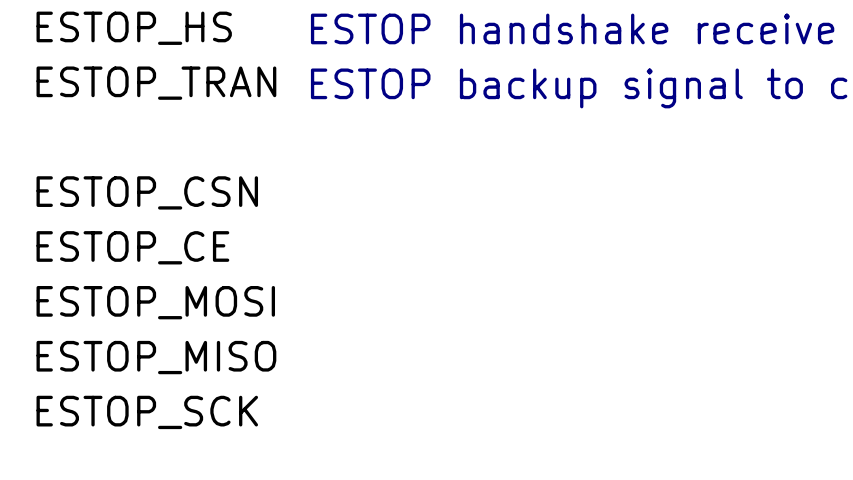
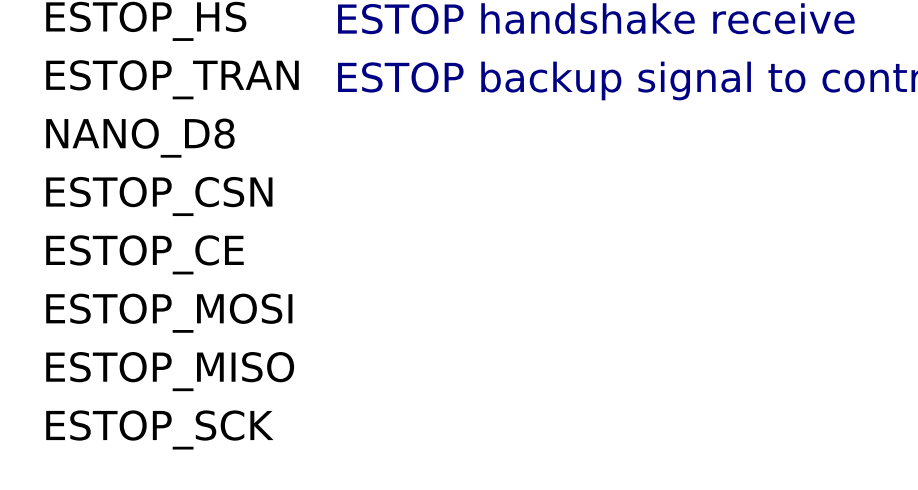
label: none -> NANO_D8 (140, 138)

